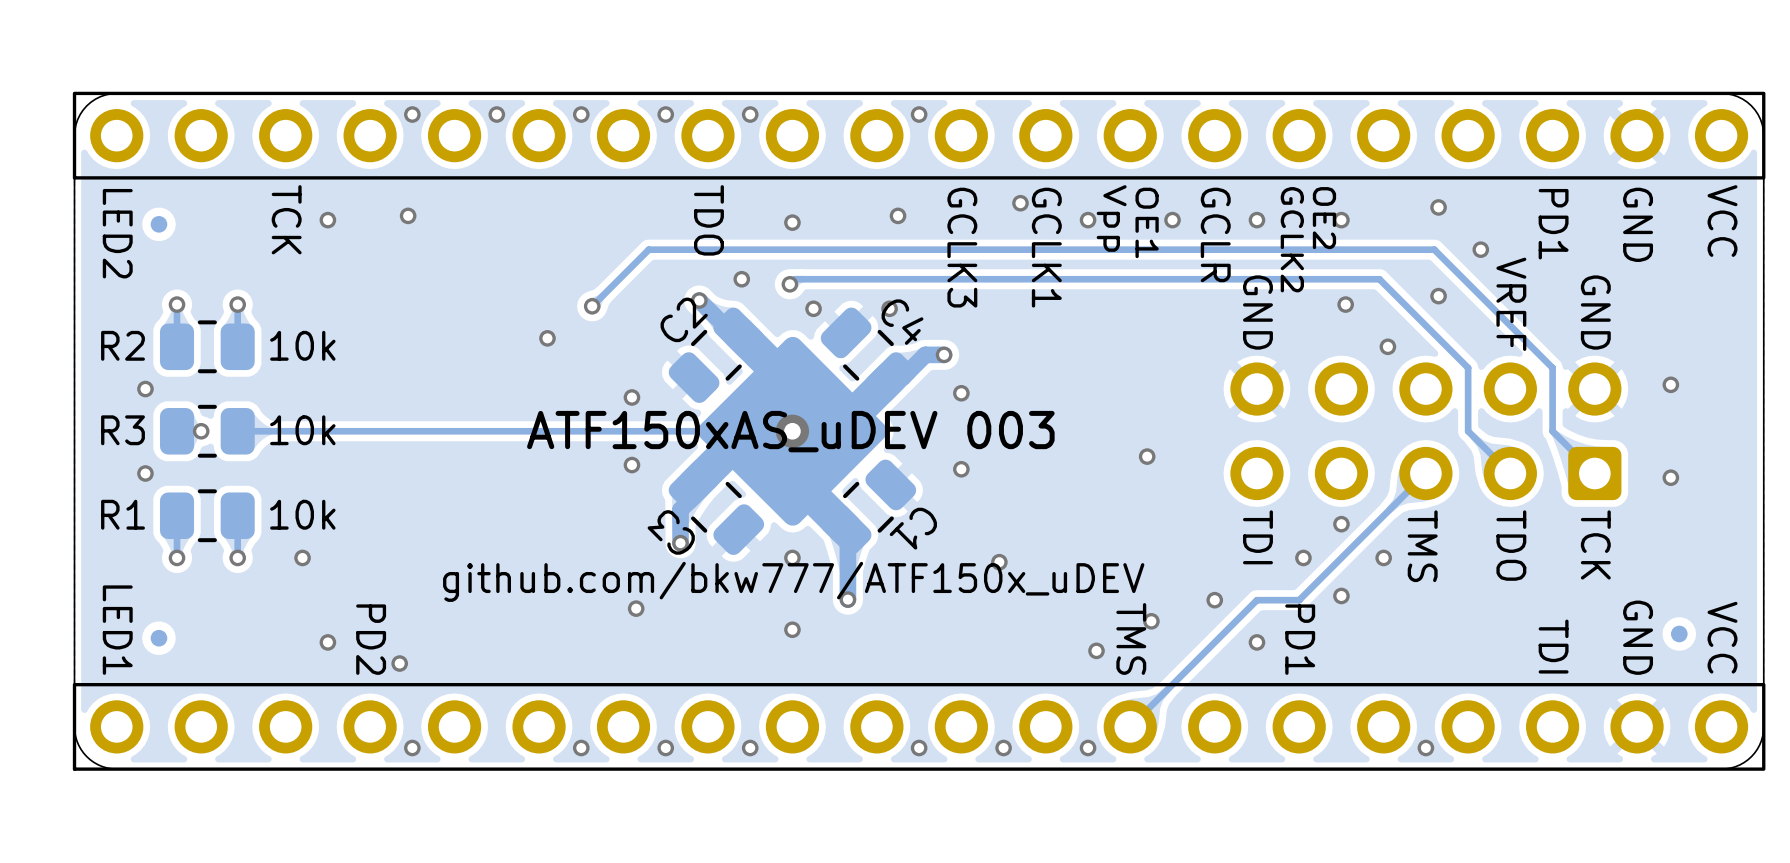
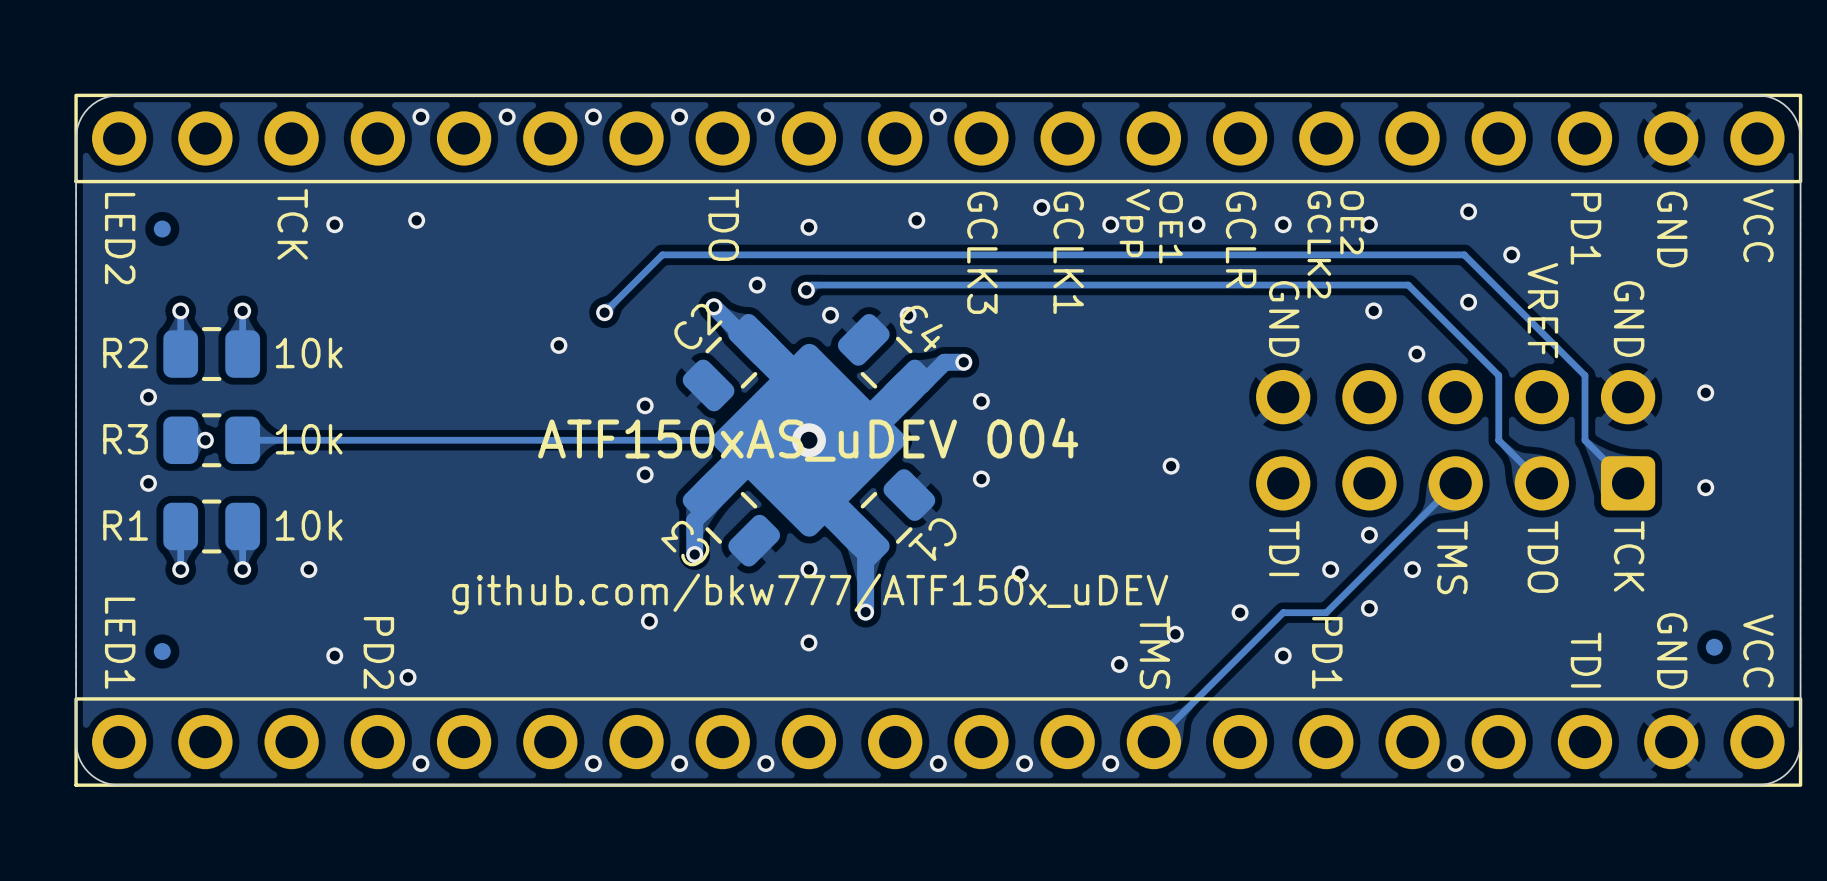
text: ATF150xAS_uDEV 003 (790, 431) -> ATF150xAS_uDEV 004 (808, 439)

